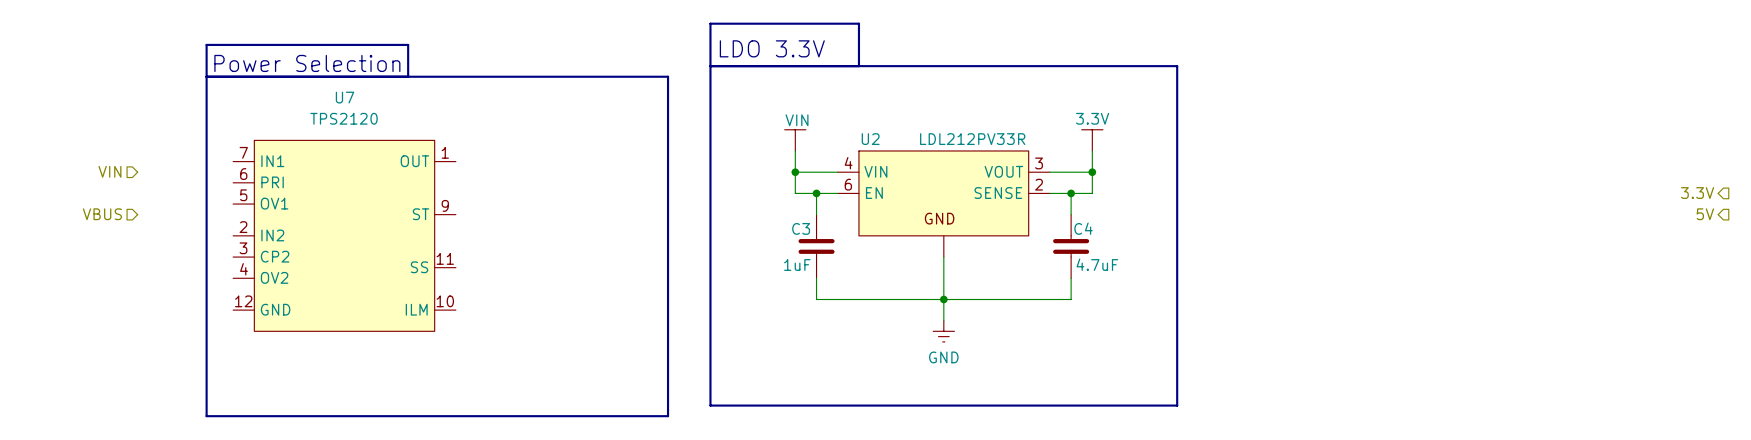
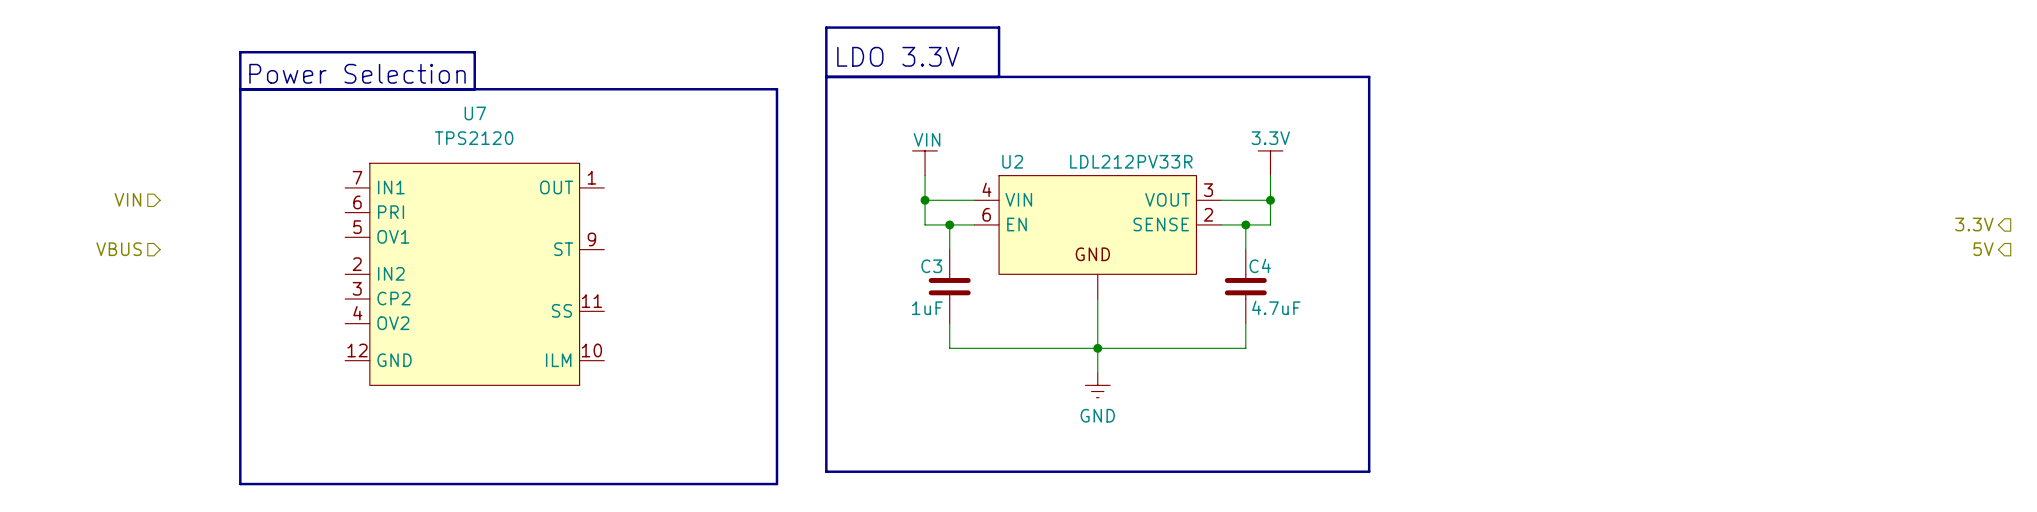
U7 position: (344, 235) -> (474, 274)

